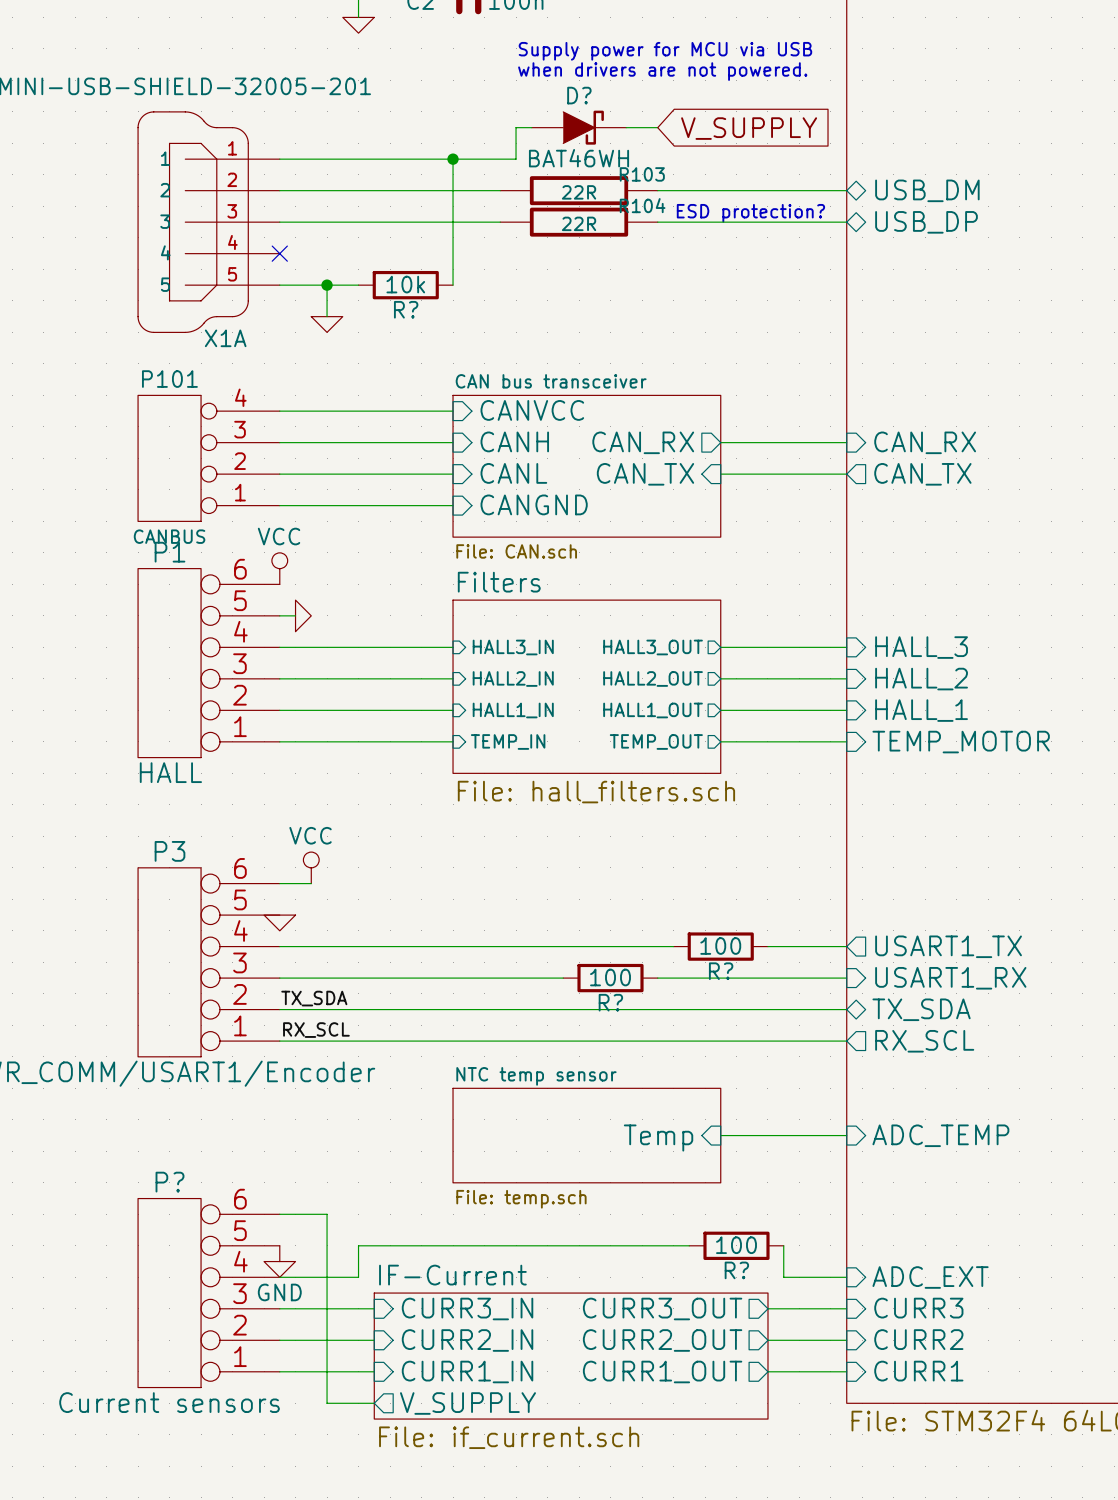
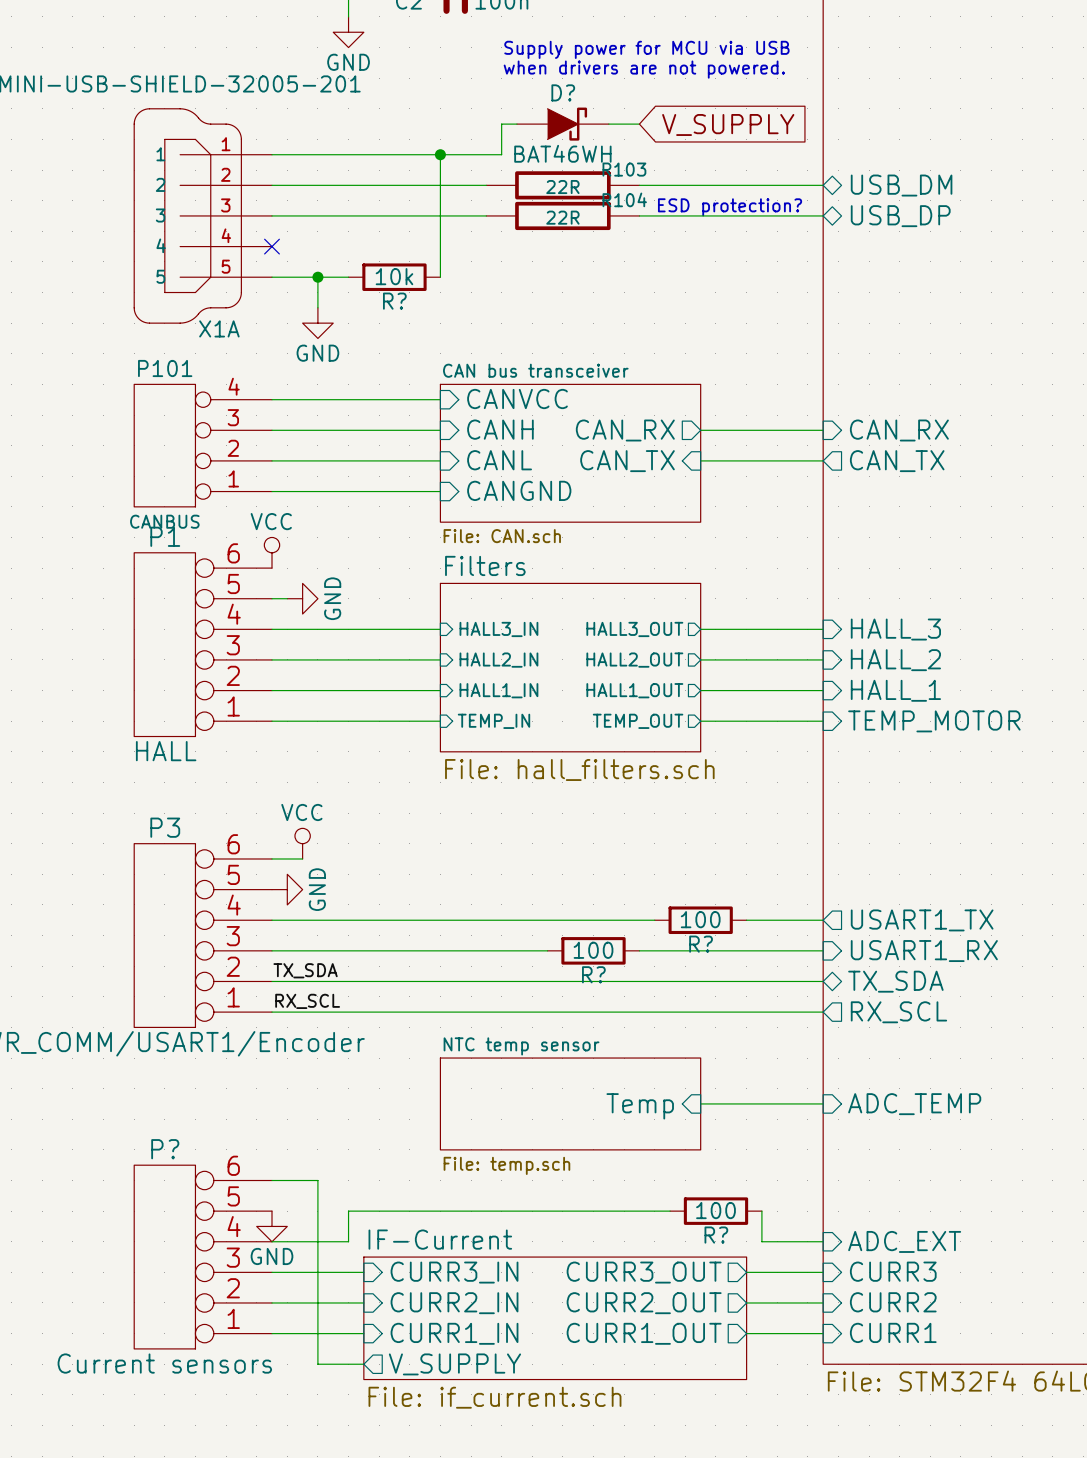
power symbol shape: [342, 17, 375, 34] -> [333, 16, 364, 48]
power symbol text: none -> GND (348, 62)
power symbol shape: [311, 316, 343, 333] -> [302, 307, 334, 339]
power symbol text: none -> GND (317, 353)
power symbol shape: [295, 600, 312, 632] -> [287, 583, 318, 615]
power symbol text: none -> GND (332, 598)
power symbol: none -> GND (287, 889)
power symbol: (279, 922) -> none

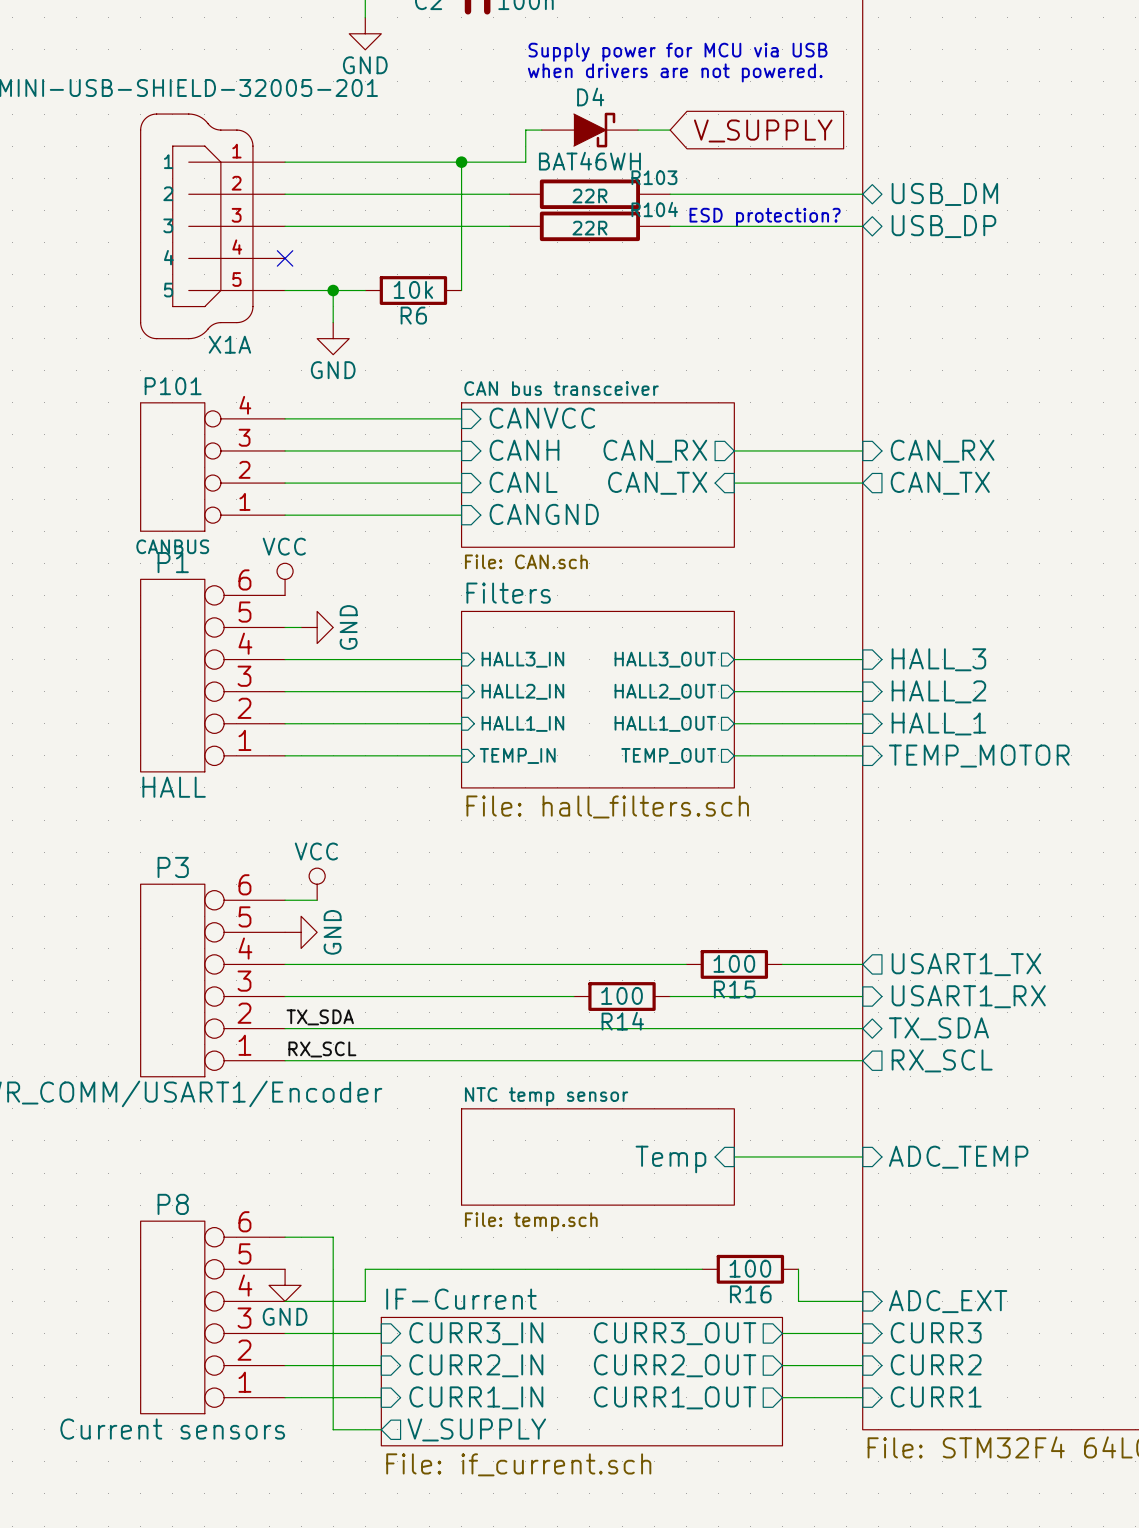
D? name: D? (563, 92) -> D4 (590, 96)
R? name: R? (394, 301) -> R6 (413, 315)
R? name: R? (701, 944) -> R15 (734, 989)
R? name: R? (593, 974) -> R14 (622, 1021)
P? name: P? (165, 1149) -> P8 (173, 1204)
R? name: R? (716, 1235) -> R16 (750, 1294)

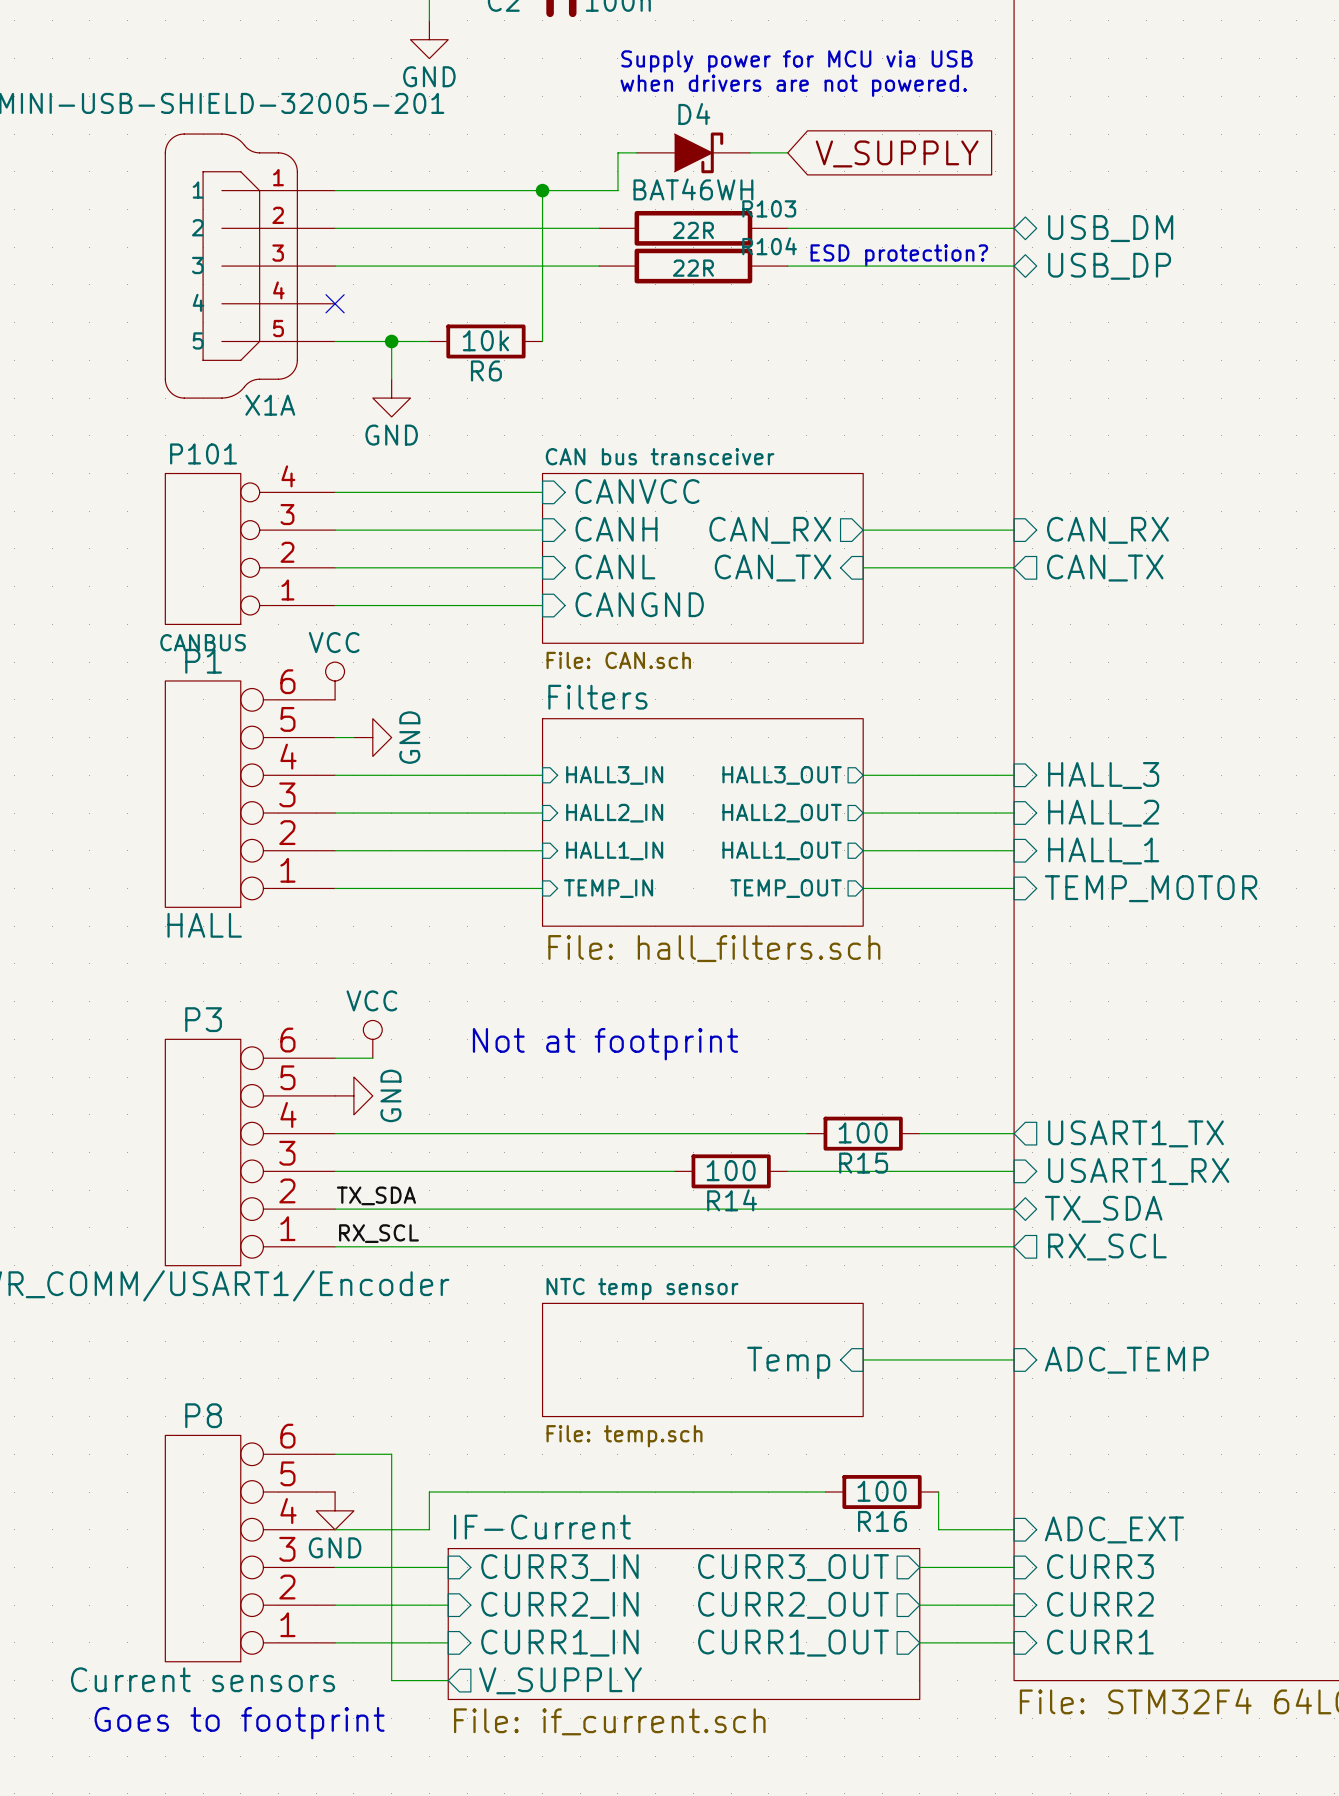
text: none -> Not at footprint (605, 1044)
text: none -> Goes to footprint (239, 1723)

